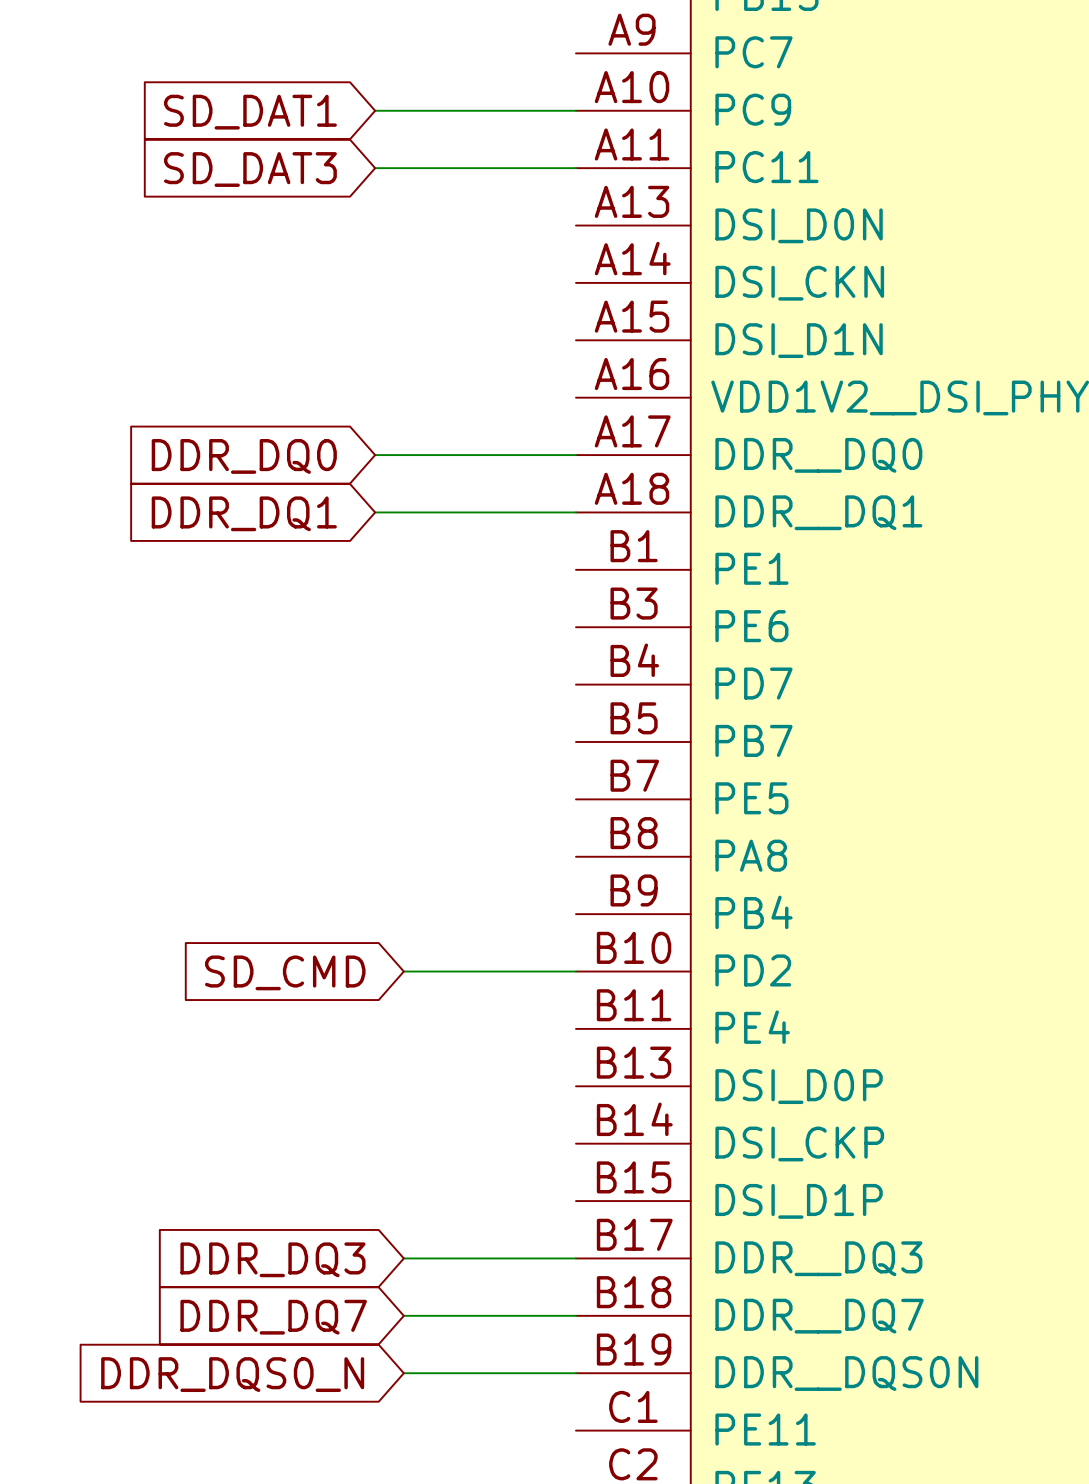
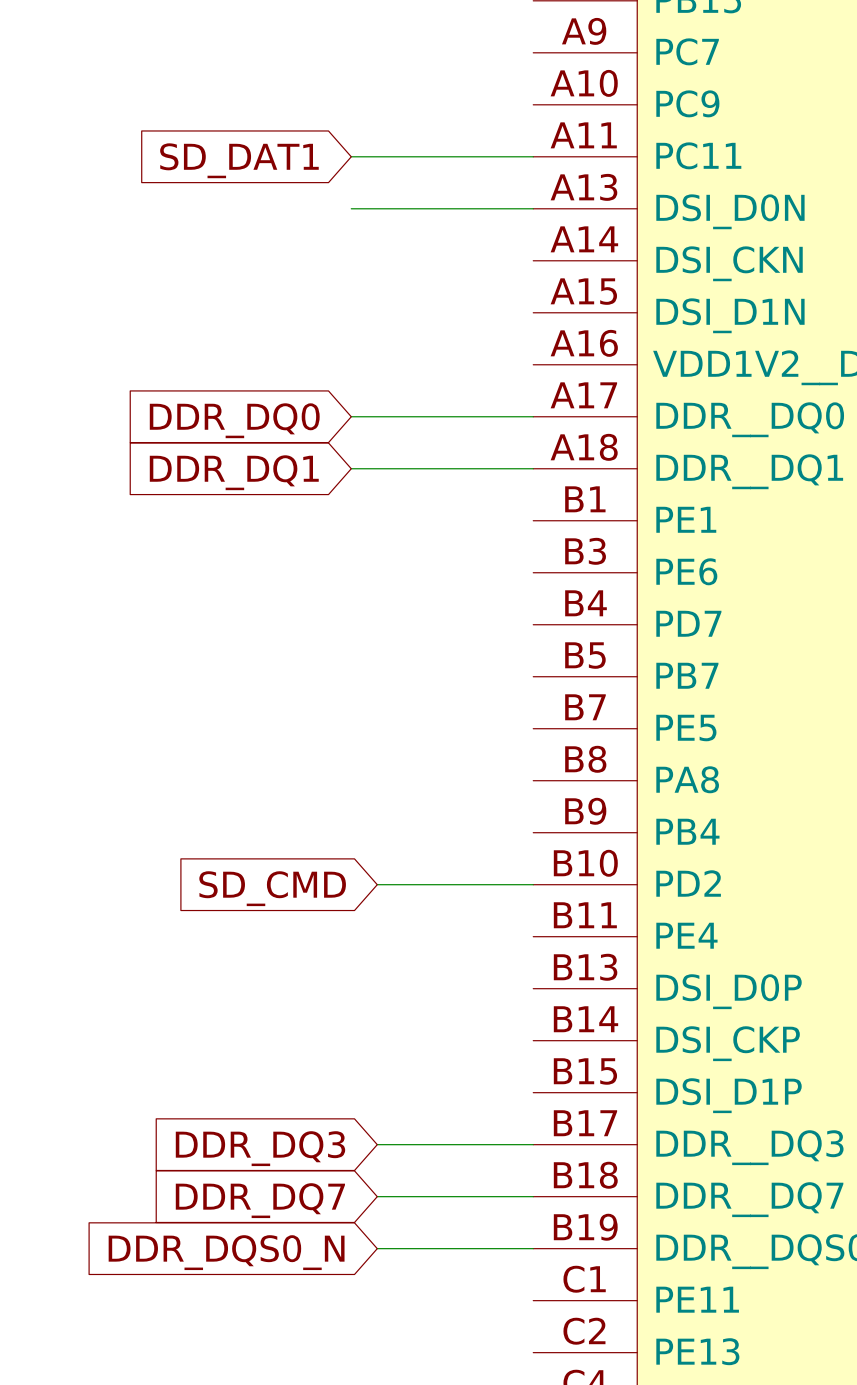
wire: (375, 110) (575, 110) -> (351, 208) (533, 208)
global label: SD_DAT1 (250, 112) -> none
global label: SD_DAT3 (250, 169) -> SD_DAT1 (239, 160)

